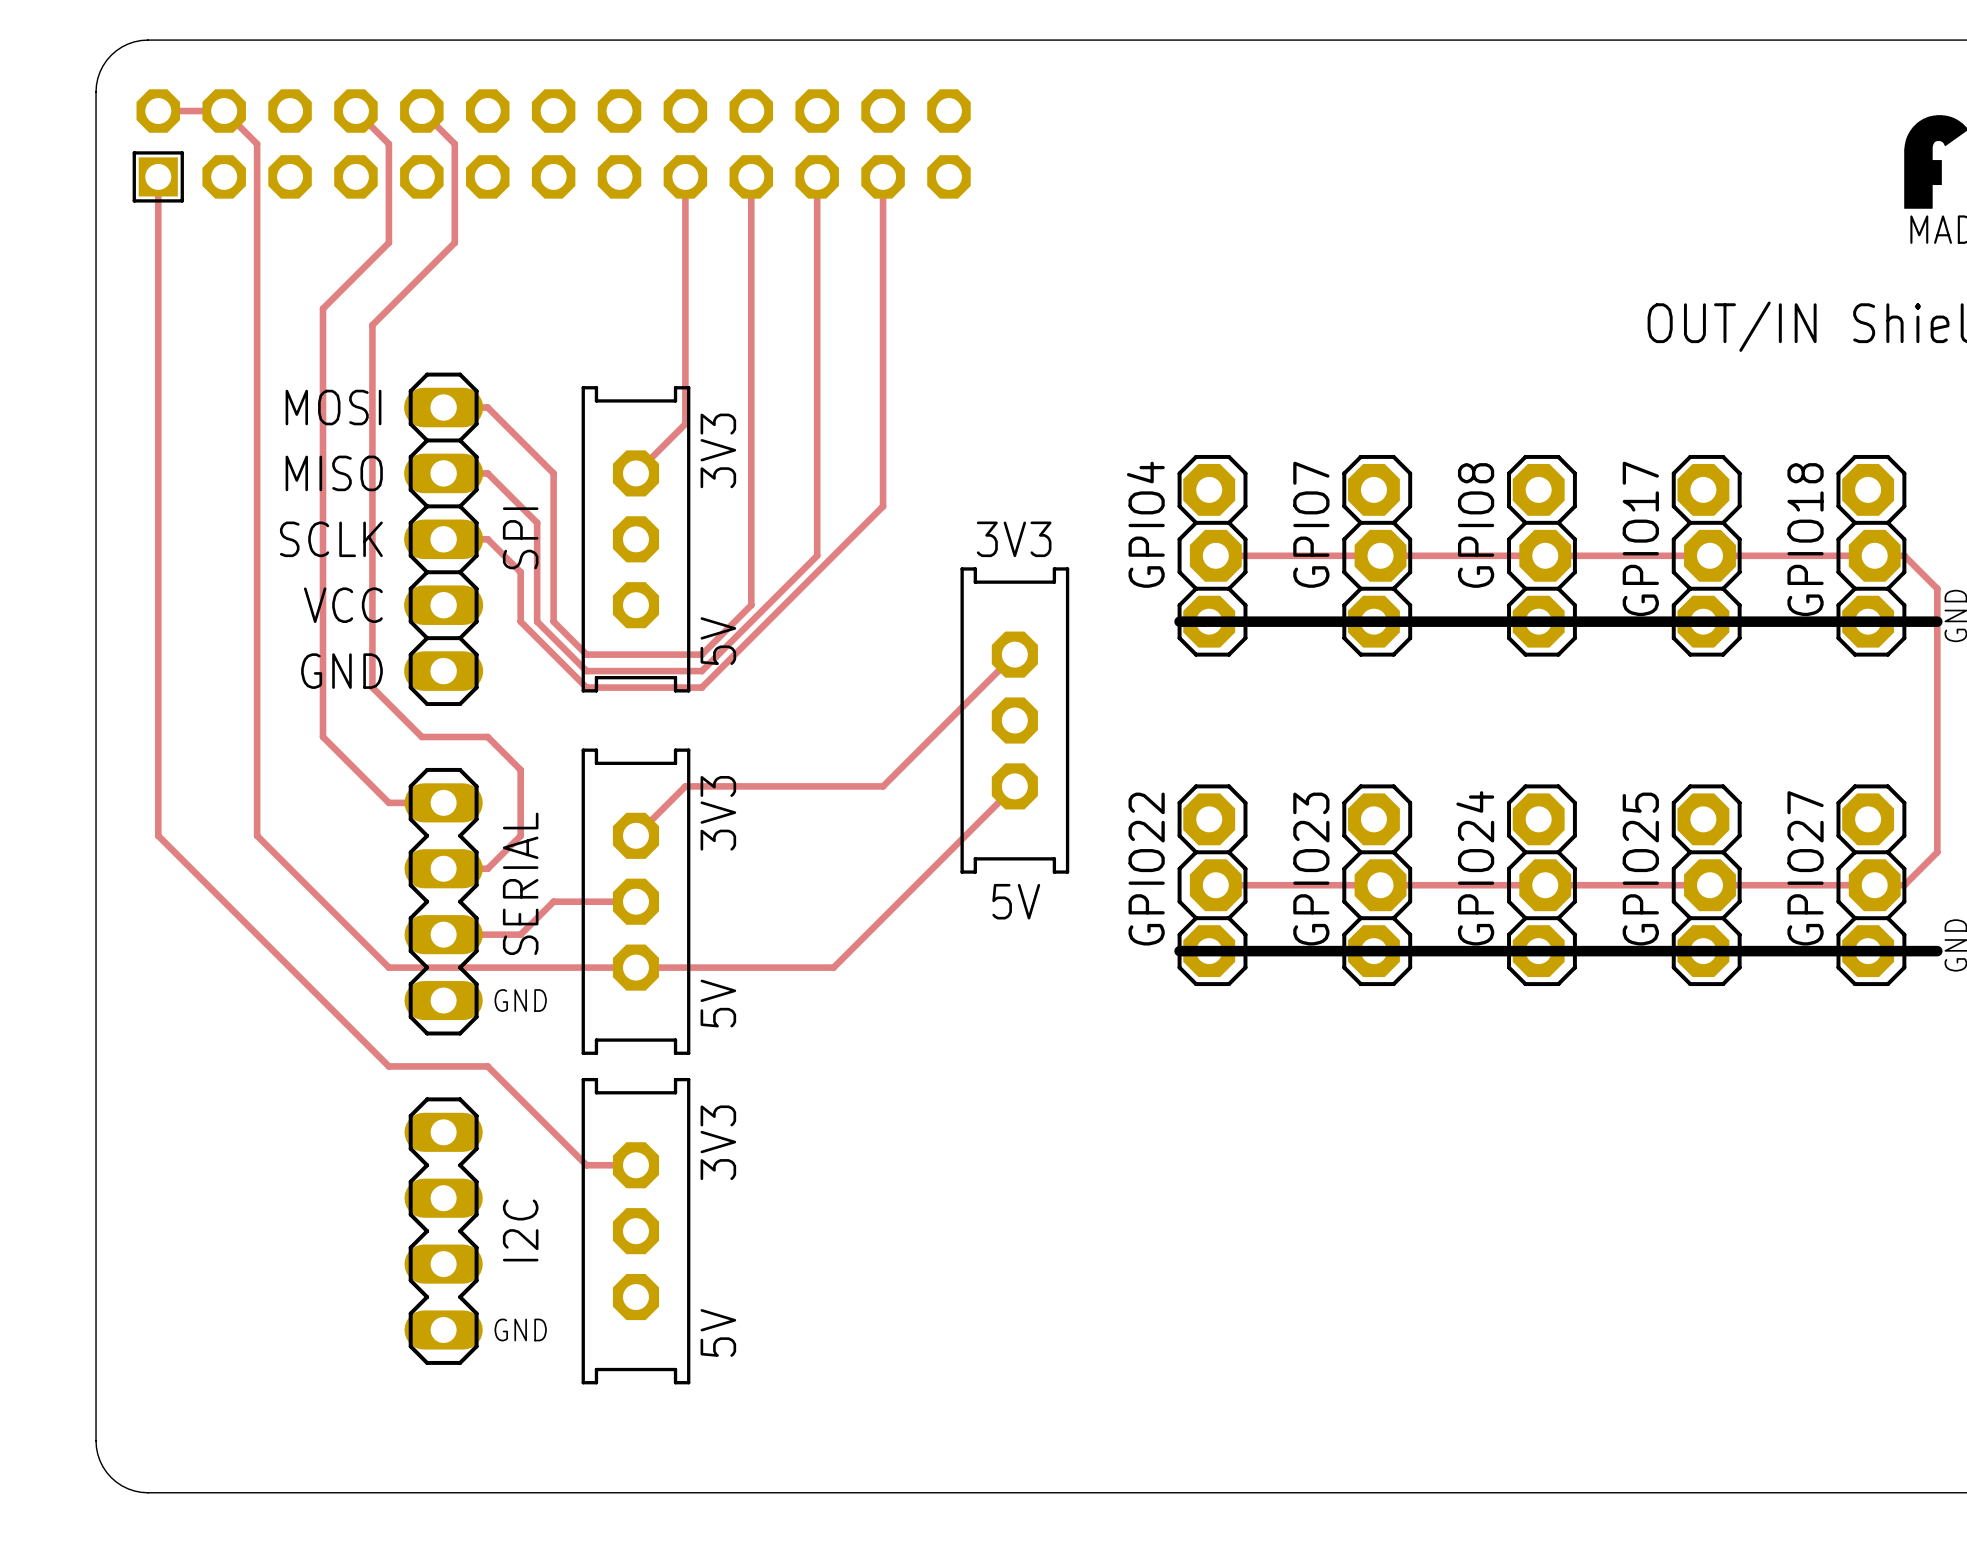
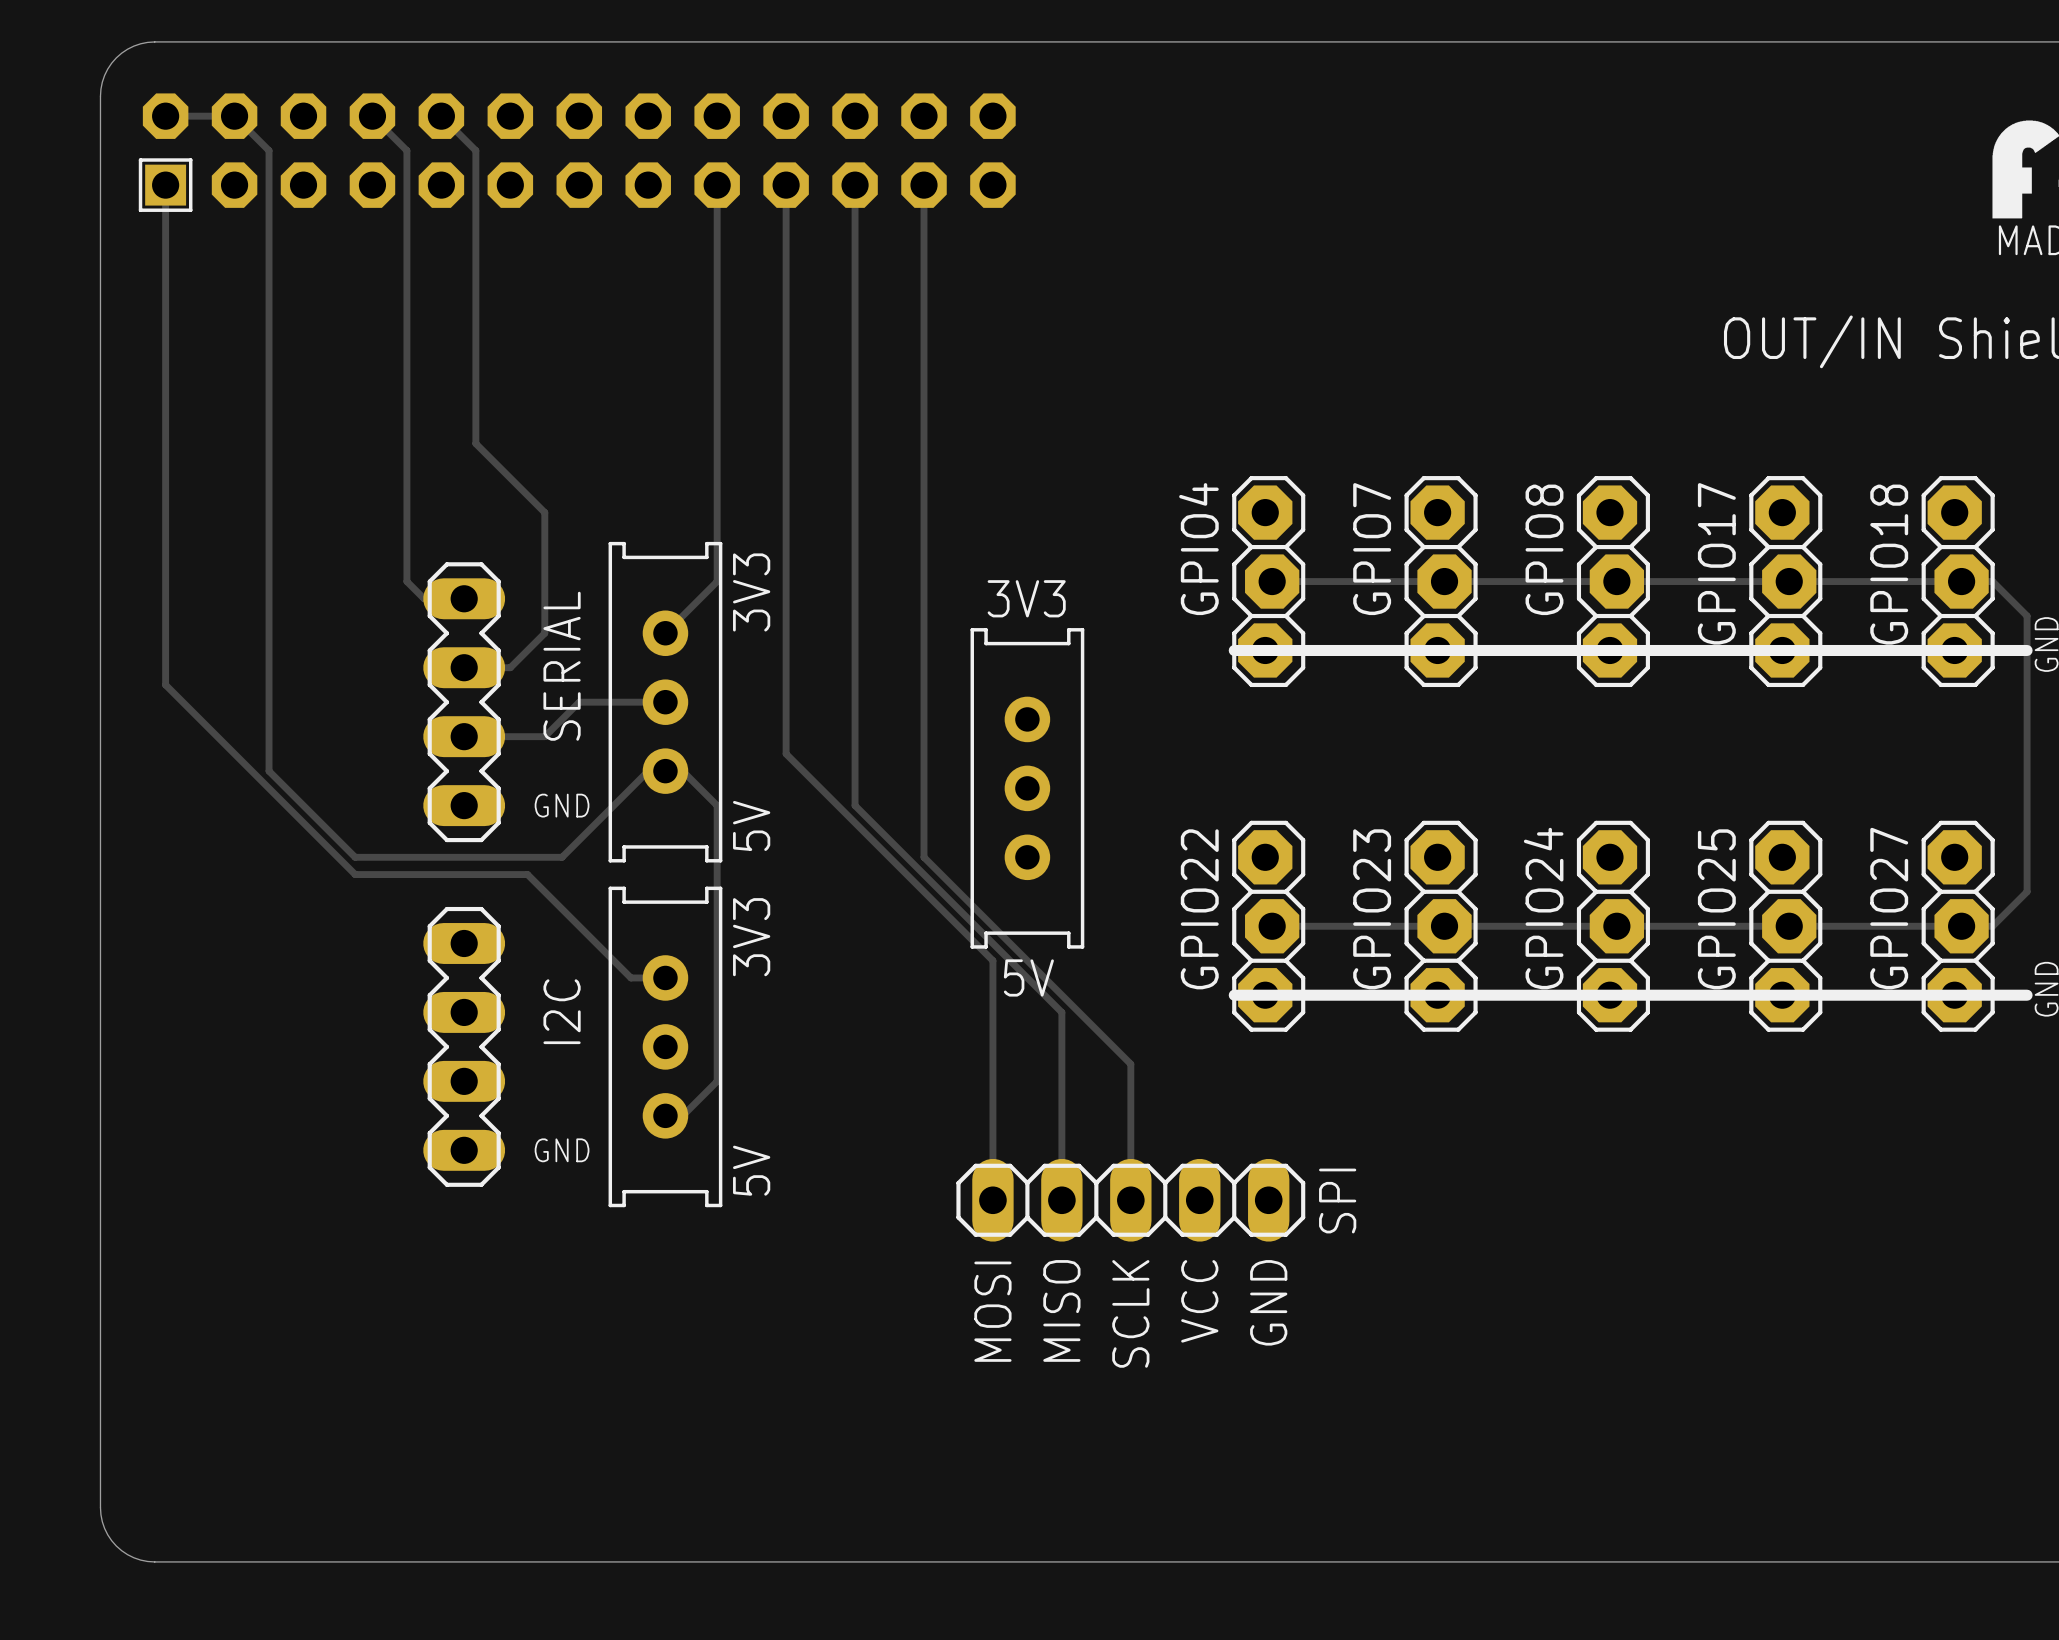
track: (388, 242) (323, 308) (323, 736) (388, 802) (443, 802) -> (406, 254) (406, 581) (424, 598) (464, 598)
track: (454, 242) (372, 325) (372, 687) (421, 736) (487, 736) (520, 769) (520, 835) (487, 868) (443, 868) -> none
text: MOSI (333, 407) -> none
track: (443, 407) (487, 407) (553, 473) (553, 621) (586, 654) (701, 654) (751, 605) -> (992, 1200) (992, 960) (786, 753) (786, 633)
track: (685, 424) (635, 473) -> (717, 443) (717, 581) (665, 633)
text position: 3V3 (718, 450) -> 3V3 (751, 592)
text: MISO (334, 473) -> none
track: (443, 473) (487, 473) (537, 522) (537, 621) (586, 671) -> (464, 736) (544, 736) (579, 702) (613, 702)
track: (883, 506) (701, 687) (586, 687) (520, 621) (520, 605) -> (464, 667) (510, 667) (544, 633)
track: none -> (924, 529) (924, 857) (1130, 1064) (1130, 1200)
text: SPI (520, 538) -> none
text: SCLK (331, 539) -> none
track: (443, 539) (487, 539) (520, 572) -> (475, 254) (475, 443) (544, 512) (544, 598)
part: (443, 539) -> none
part: (635, 539) -> none
text position: 3V3 (1014, 539) -> 3V3 (1026, 598)
track: (817, 555) (701, 671) (635, 671) -> (855, 581) (855, 805) (1061, 1012) (1061, 1200)
text: VCC (343, 605) -> none
text: 5V (718, 641) -> none
track: (158, 654) (158, 835) (388, 1066) (487, 1066) (586, 1165) (635, 1165) -> (165, 684) (355, 874) (527, 874) (630, 977) (665, 977)
track: (1014, 654) (883, 786) (685, 786) (635, 835) -> none
text: GND (341, 671) -> none
part: none -> (464, 702)
part: none -> (665, 702)
part: (1014, 720) -> none
track: (257, 736) (257, 835) (388, 967) (833, 967) (1014, 786) -> (269, 771) (355, 857) (562, 857) (648, 771) (682, 771) (717, 805) (717, 1081) (682, 1115) (665, 1115)
part: none -> (1027, 788)
text: none -> GND (562, 805)
text: none -> 5V (751, 825)
text position: 3V3 (718, 813) -> 3V3 (751, 937)
text position: SERIAL (520, 883) -> SERIAL (562, 666)
part position: (443, 901) -> (464, 1046)
track: (635, 901) (553, 901) (520, 934) (443, 934) -> none
part: (635, 901) -> none
text position: 5V (1016, 901) -> 5V (1028, 977)
text position: GND (520, 1000) -> GND (562, 1150)
part: none -> (665, 1046)
text: 5V (718, 1003) -> none
text: none -> 5V (751, 1170)
text: 3V3 (718, 1142) -> none
part: none -> (1130, 1200)
text: none -> SPI (1337, 1201)
text position: I2C (520, 1230) -> I2C (562, 1011)
part: (443, 1231) -> none
part: (635, 1231) -> none
text: none -> VCC (1199, 1301)
text: none -> GND (1268, 1302)
text: none -> MISO (1061, 1310)
text: none -> MOSI (992, 1311)
text: none -> SCLK (1130, 1313)
text: GND (520, 1329) -> none
text: 5V (718, 1332) -> none

